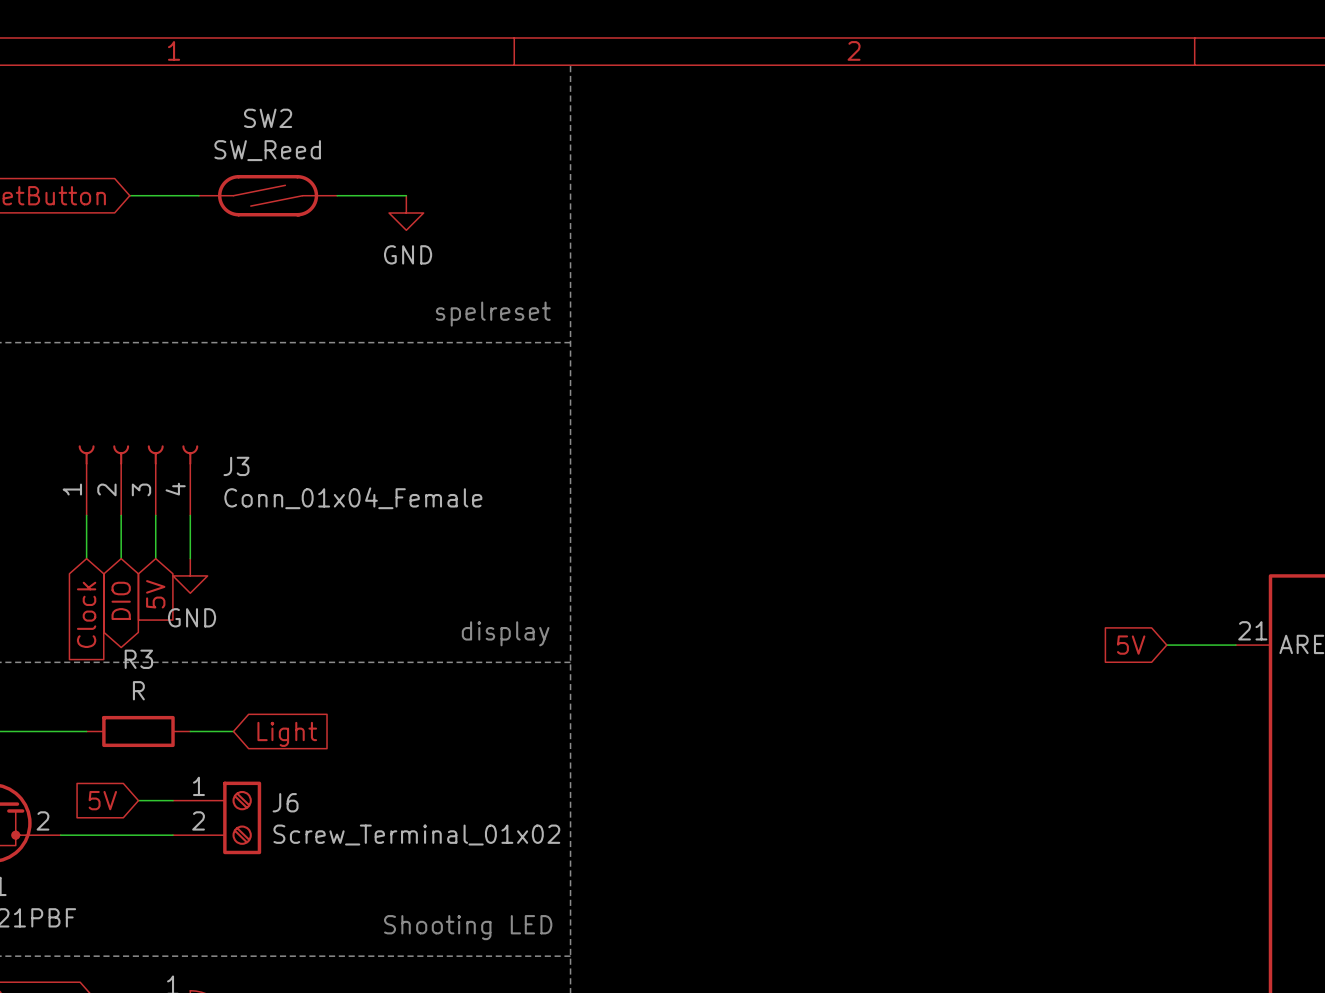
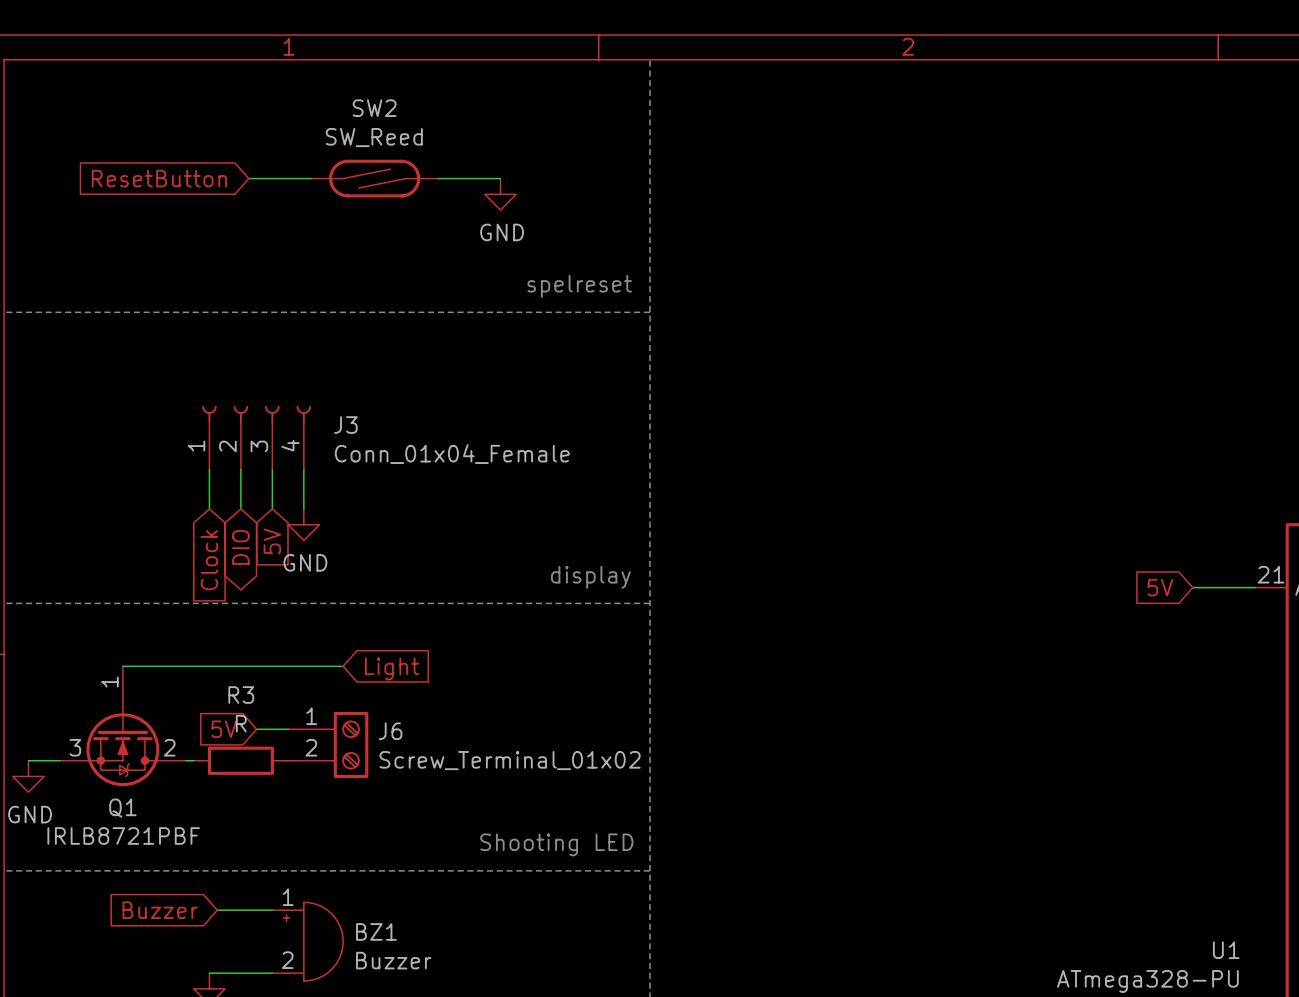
R3 position: (138, 731) -> (240, 760)
wire: (69, 835) (173, 835) -> (209, 666) (303, 666)

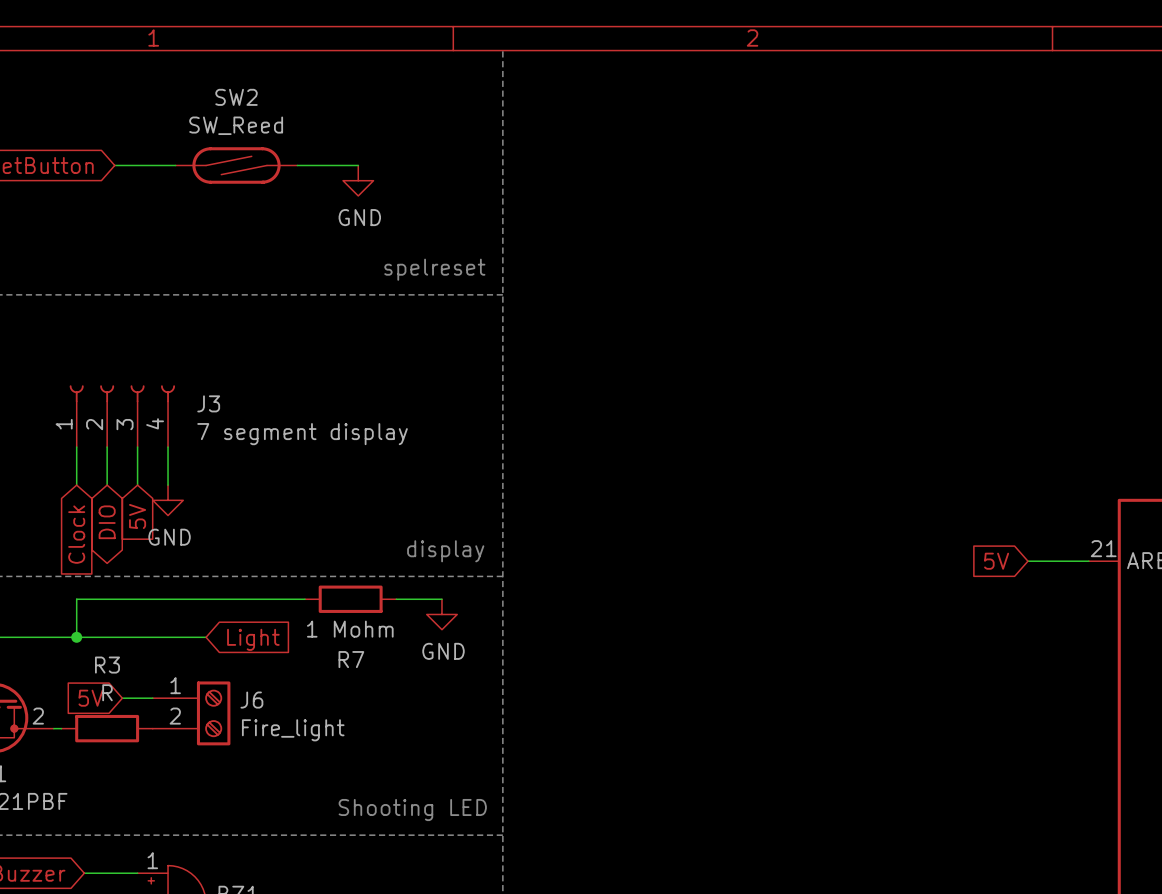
J3 value: Conn_01x04_Female (452, 454) -> 7 segment display (302, 434)
wire: none -> (305, 599) (76, 599) (76, 637)
R7: none -> 1 Mohm (350, 599)
wire: none -> (396, 599) (441, 599)
power symbol: none -> GND (441, 614)
junction: none -> (76, 637)
J6 value: Screw_Terminal_01x02 (510, 760) -> Fire_light (293, 730)

